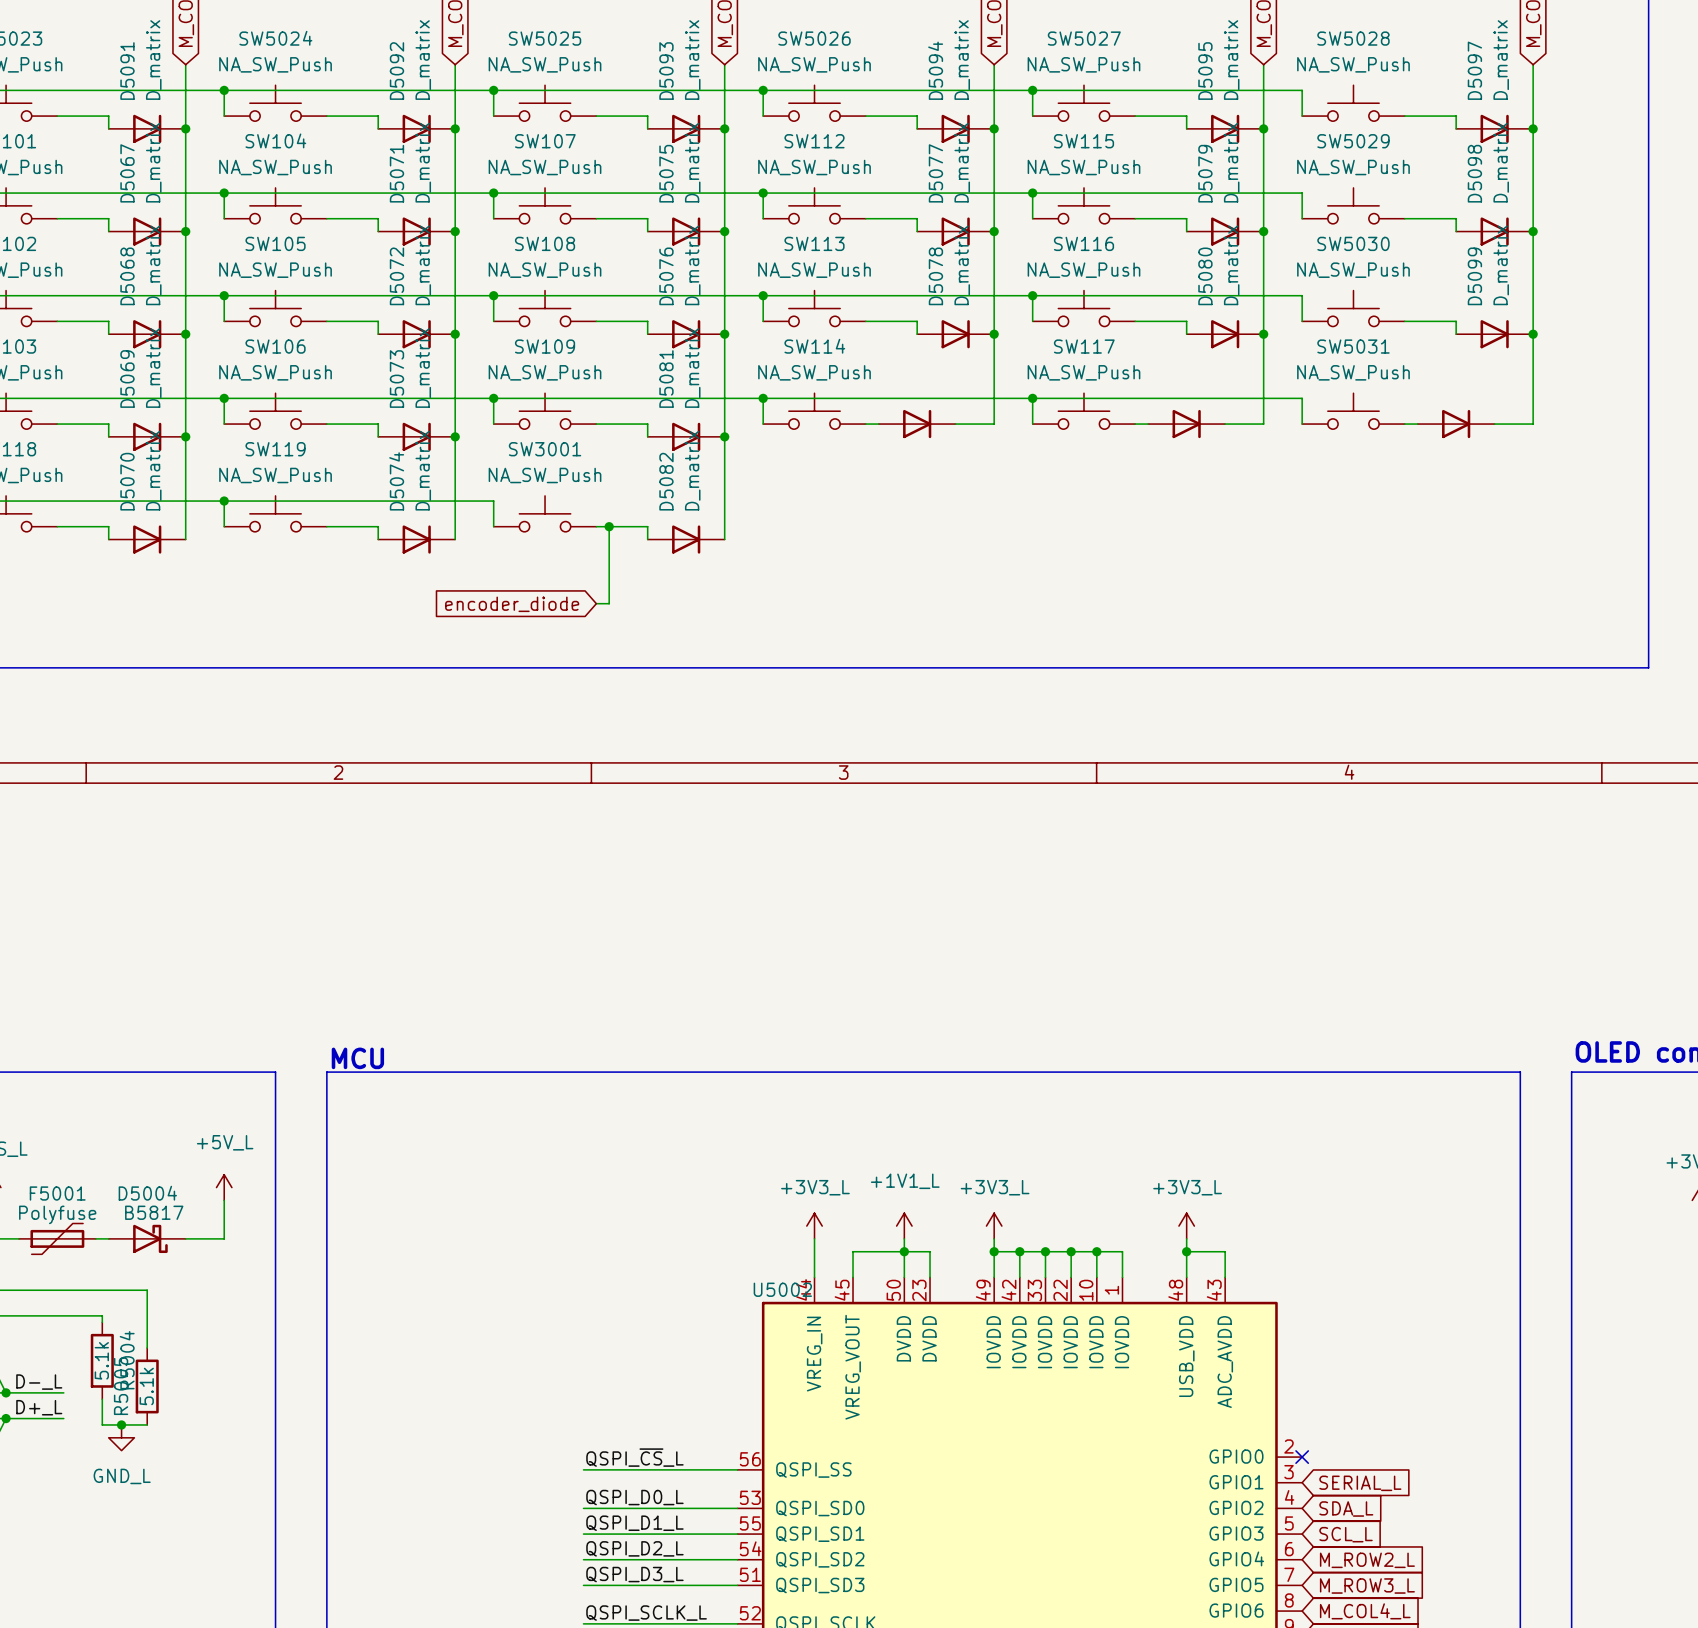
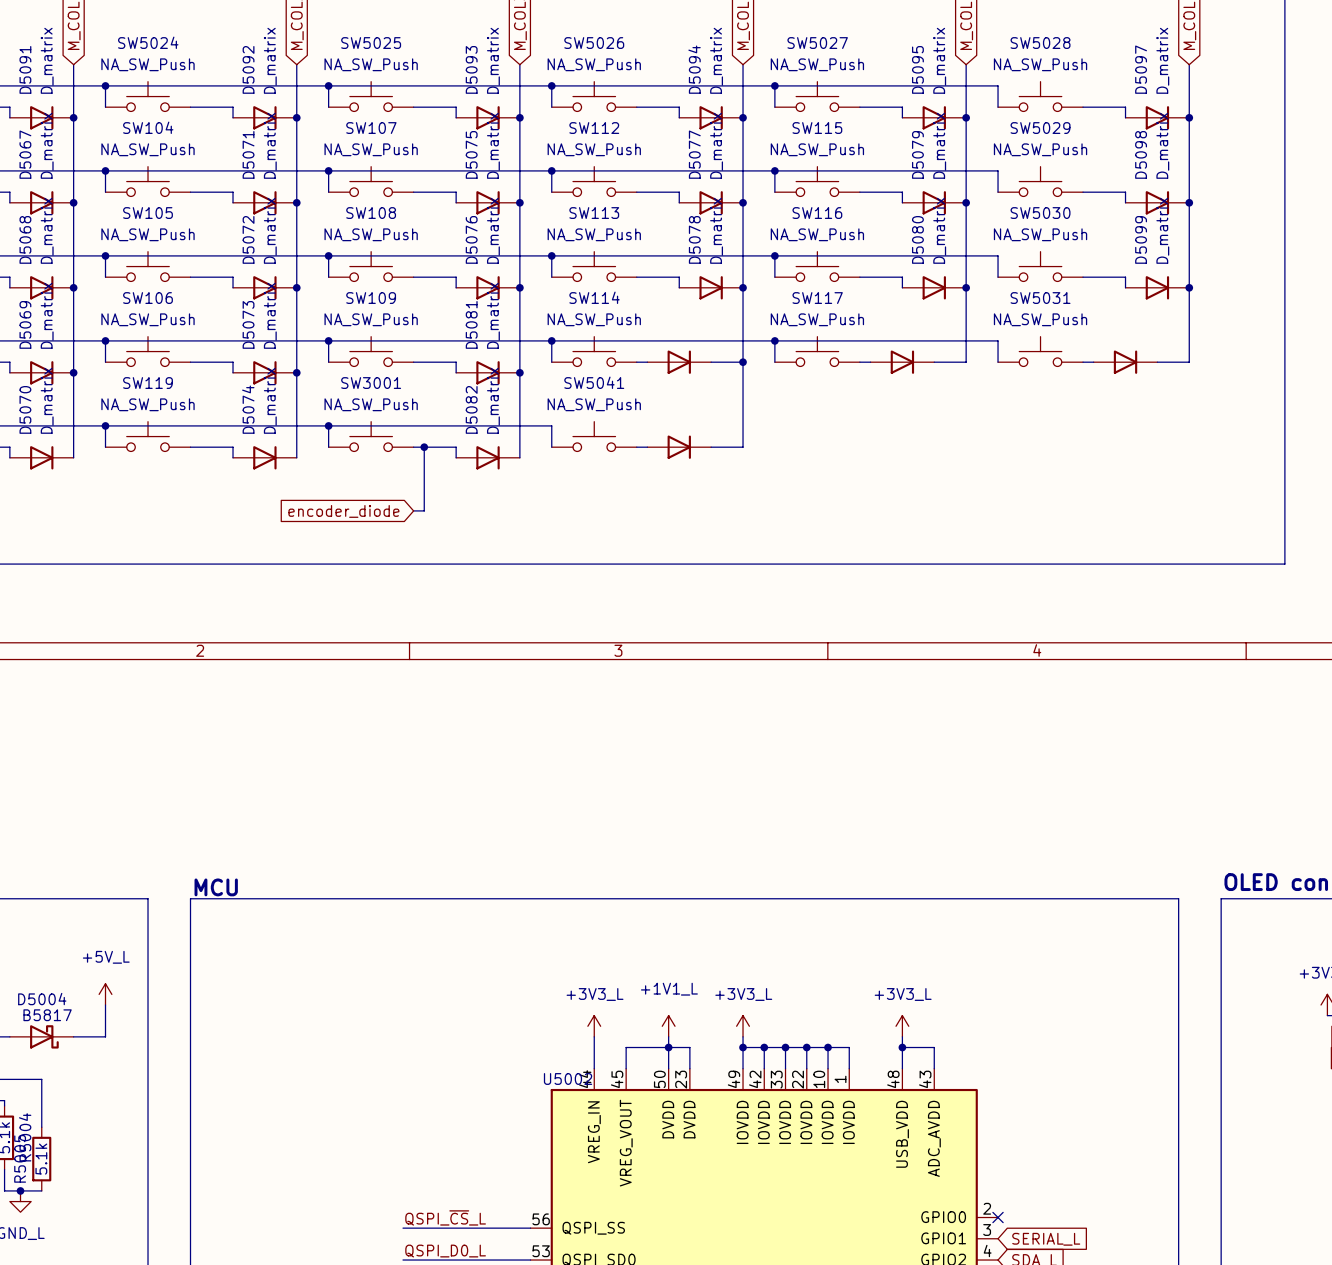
wire: none -> (743, 362) (743, 447) (711, 447)
junction: none -> (743, 362)
wire: none -> (328, 425) (551, 425) (551, 447)
junction: none -> (328, 425)
SW5041: none -> NA_SW_Push (594, 436)
wire: none -> (636, 447) (647, 447)
part: none -> (679, 447)

